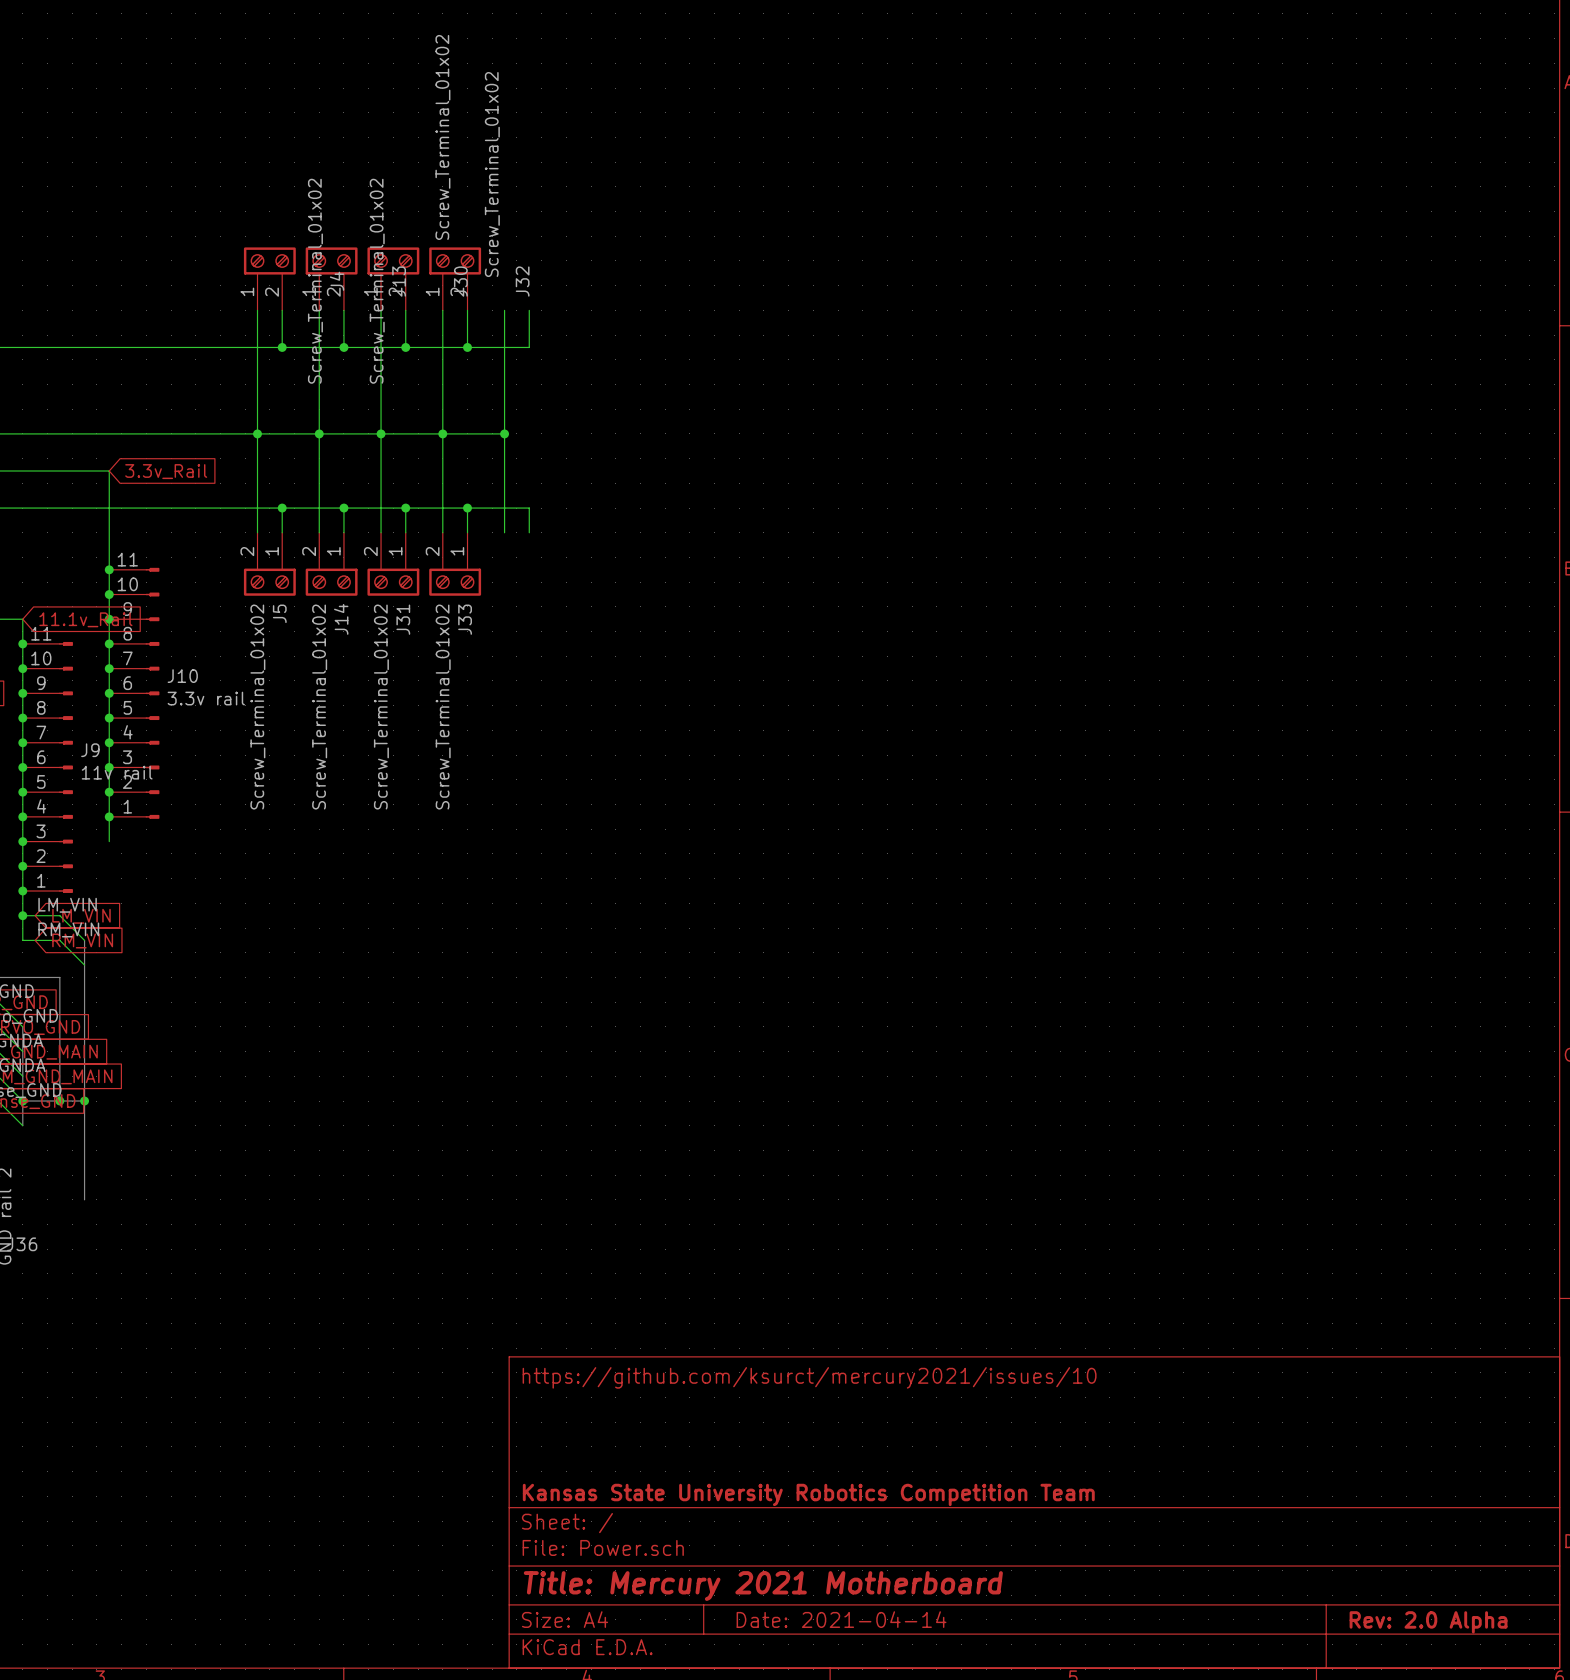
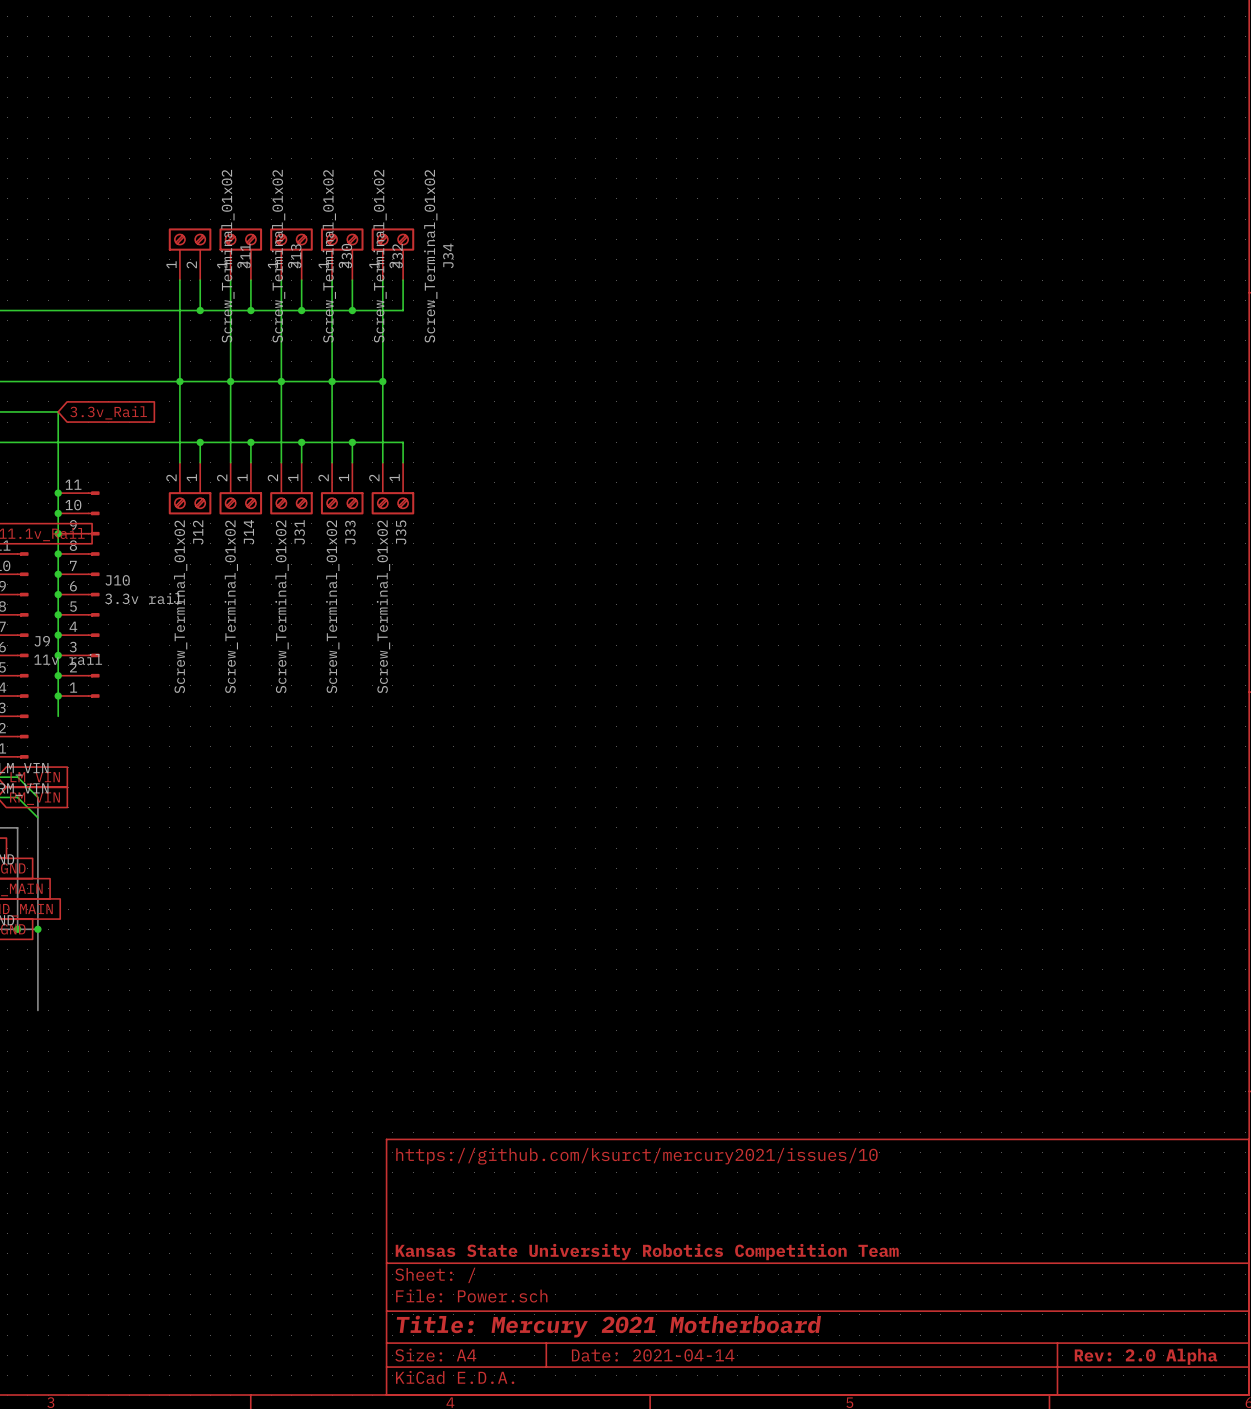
J30 value position: Screw_Terminal_01x02 (442, 137) -> Screw_Terminal_01x02 (329, 256)
J32 value position: Screw_Terminal_01x02 (492, 174) -> Screw_Terminal_01x02 (380, 256)
J34: none -> Screw_Terminal_01x02 (392, 254)
J4 name: J4 (337, 281) -> J11 (245, 255)
J35: none -> Screw_Terminal_01x02 (392, 488)
J5 name: J5 (279, 613) -> J12 (198, 532)

